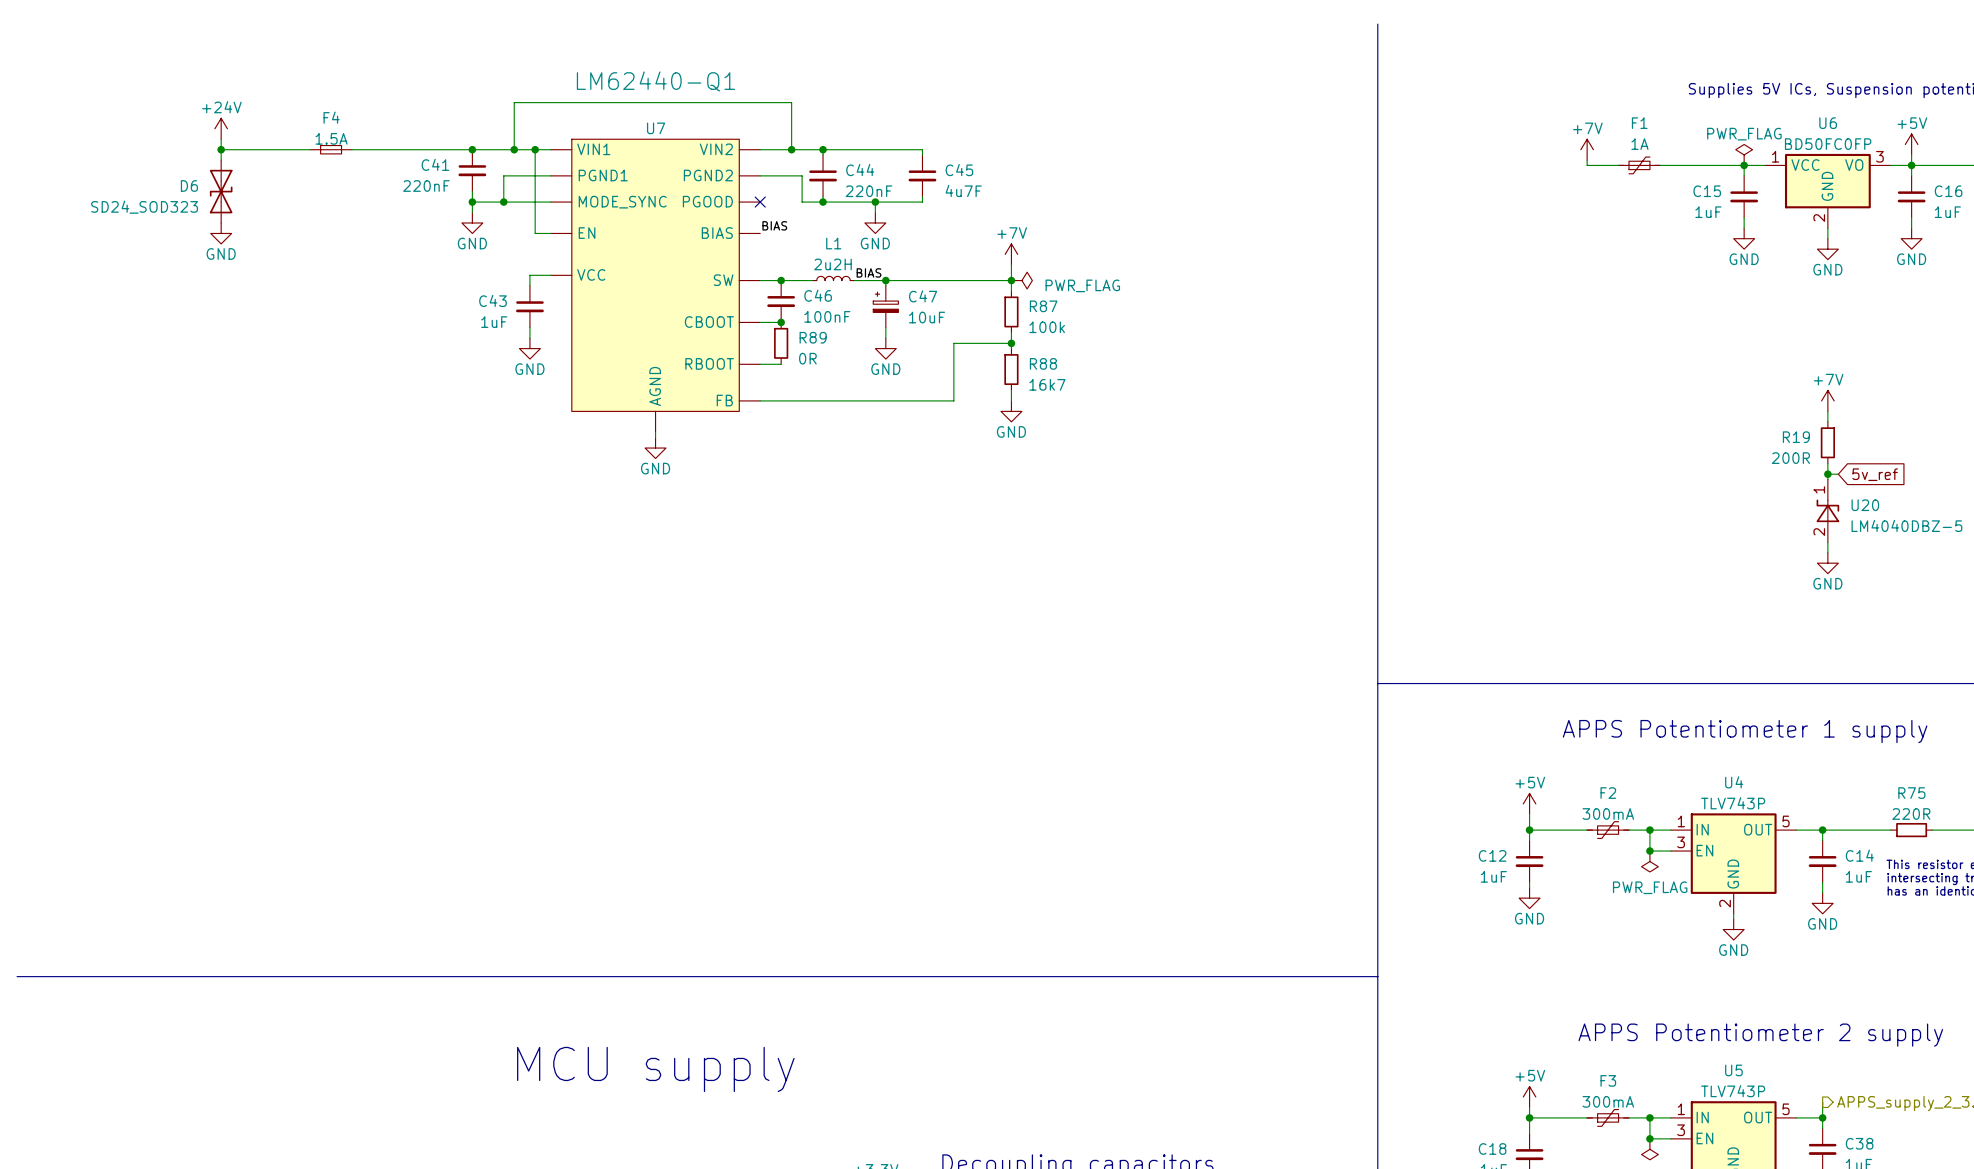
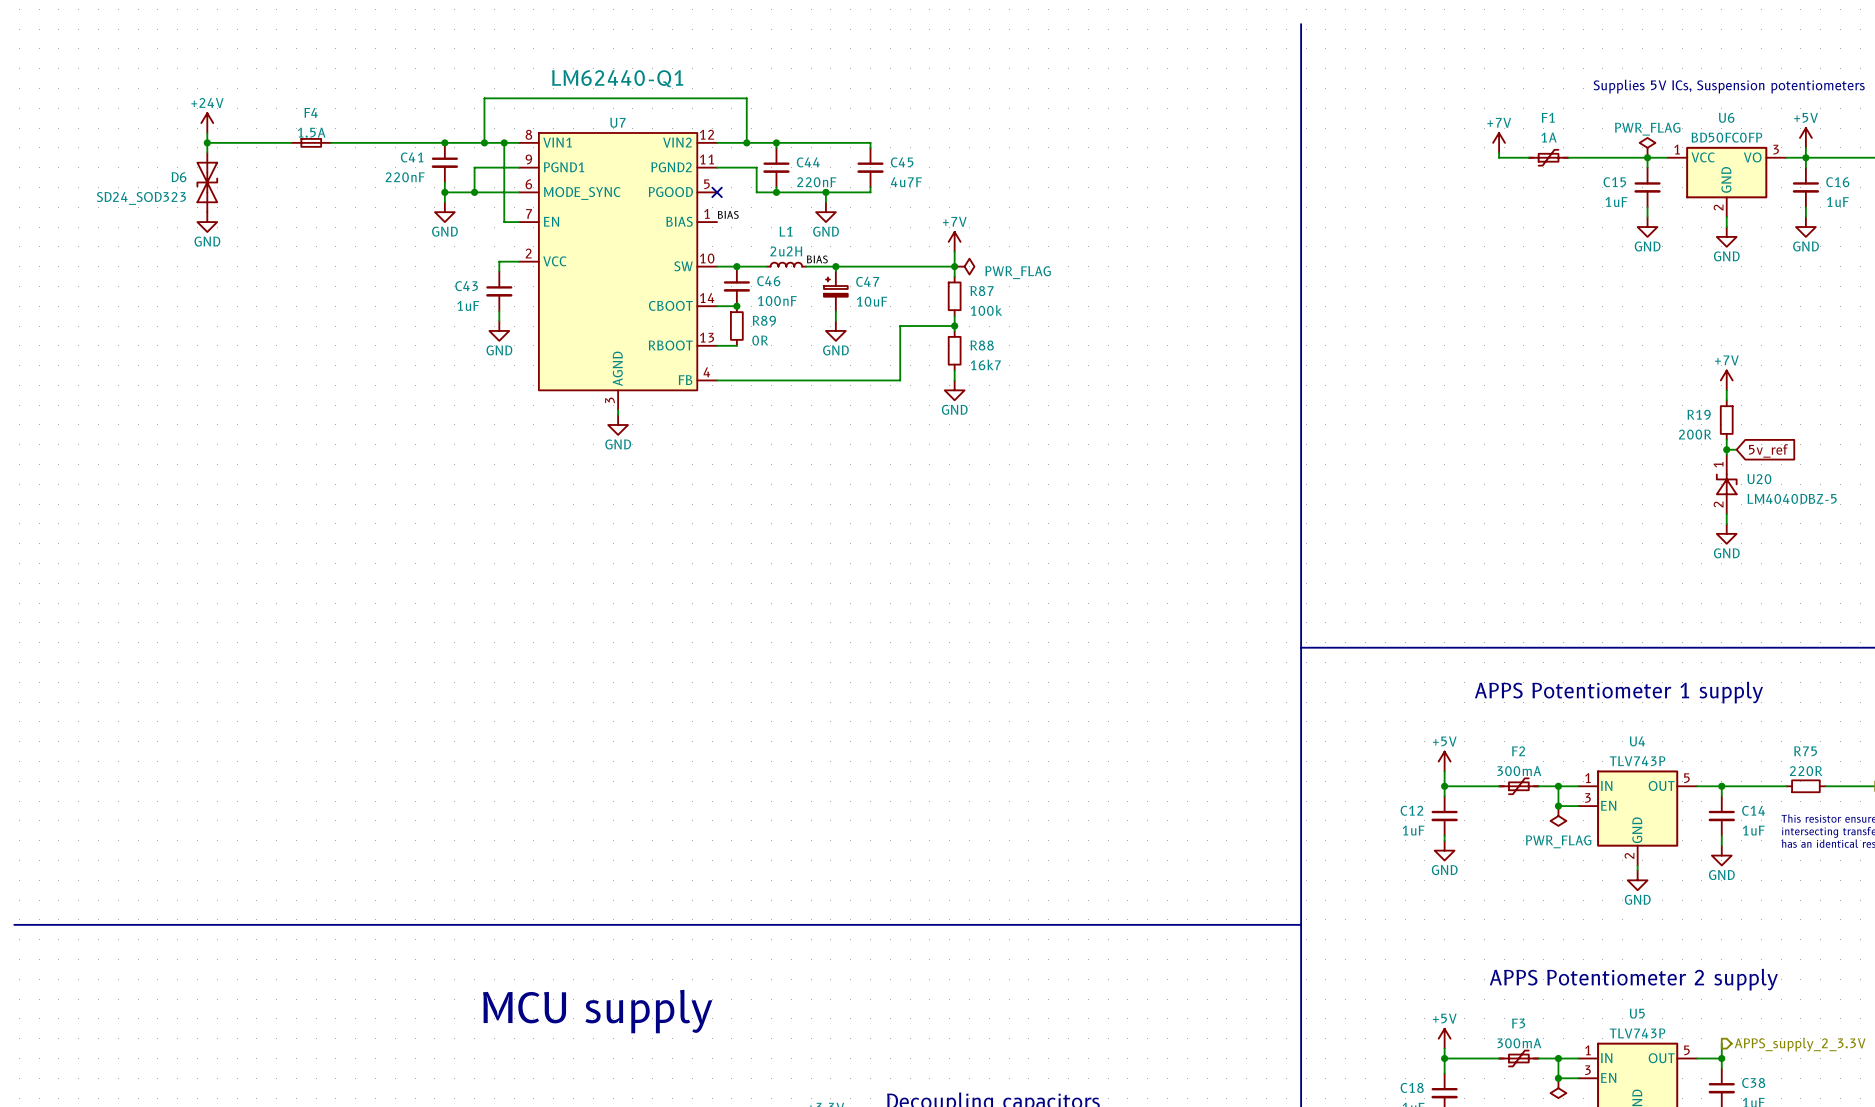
U7 symbol: [550, 139, 761, 433] -> [519, 132, 718, 411]

